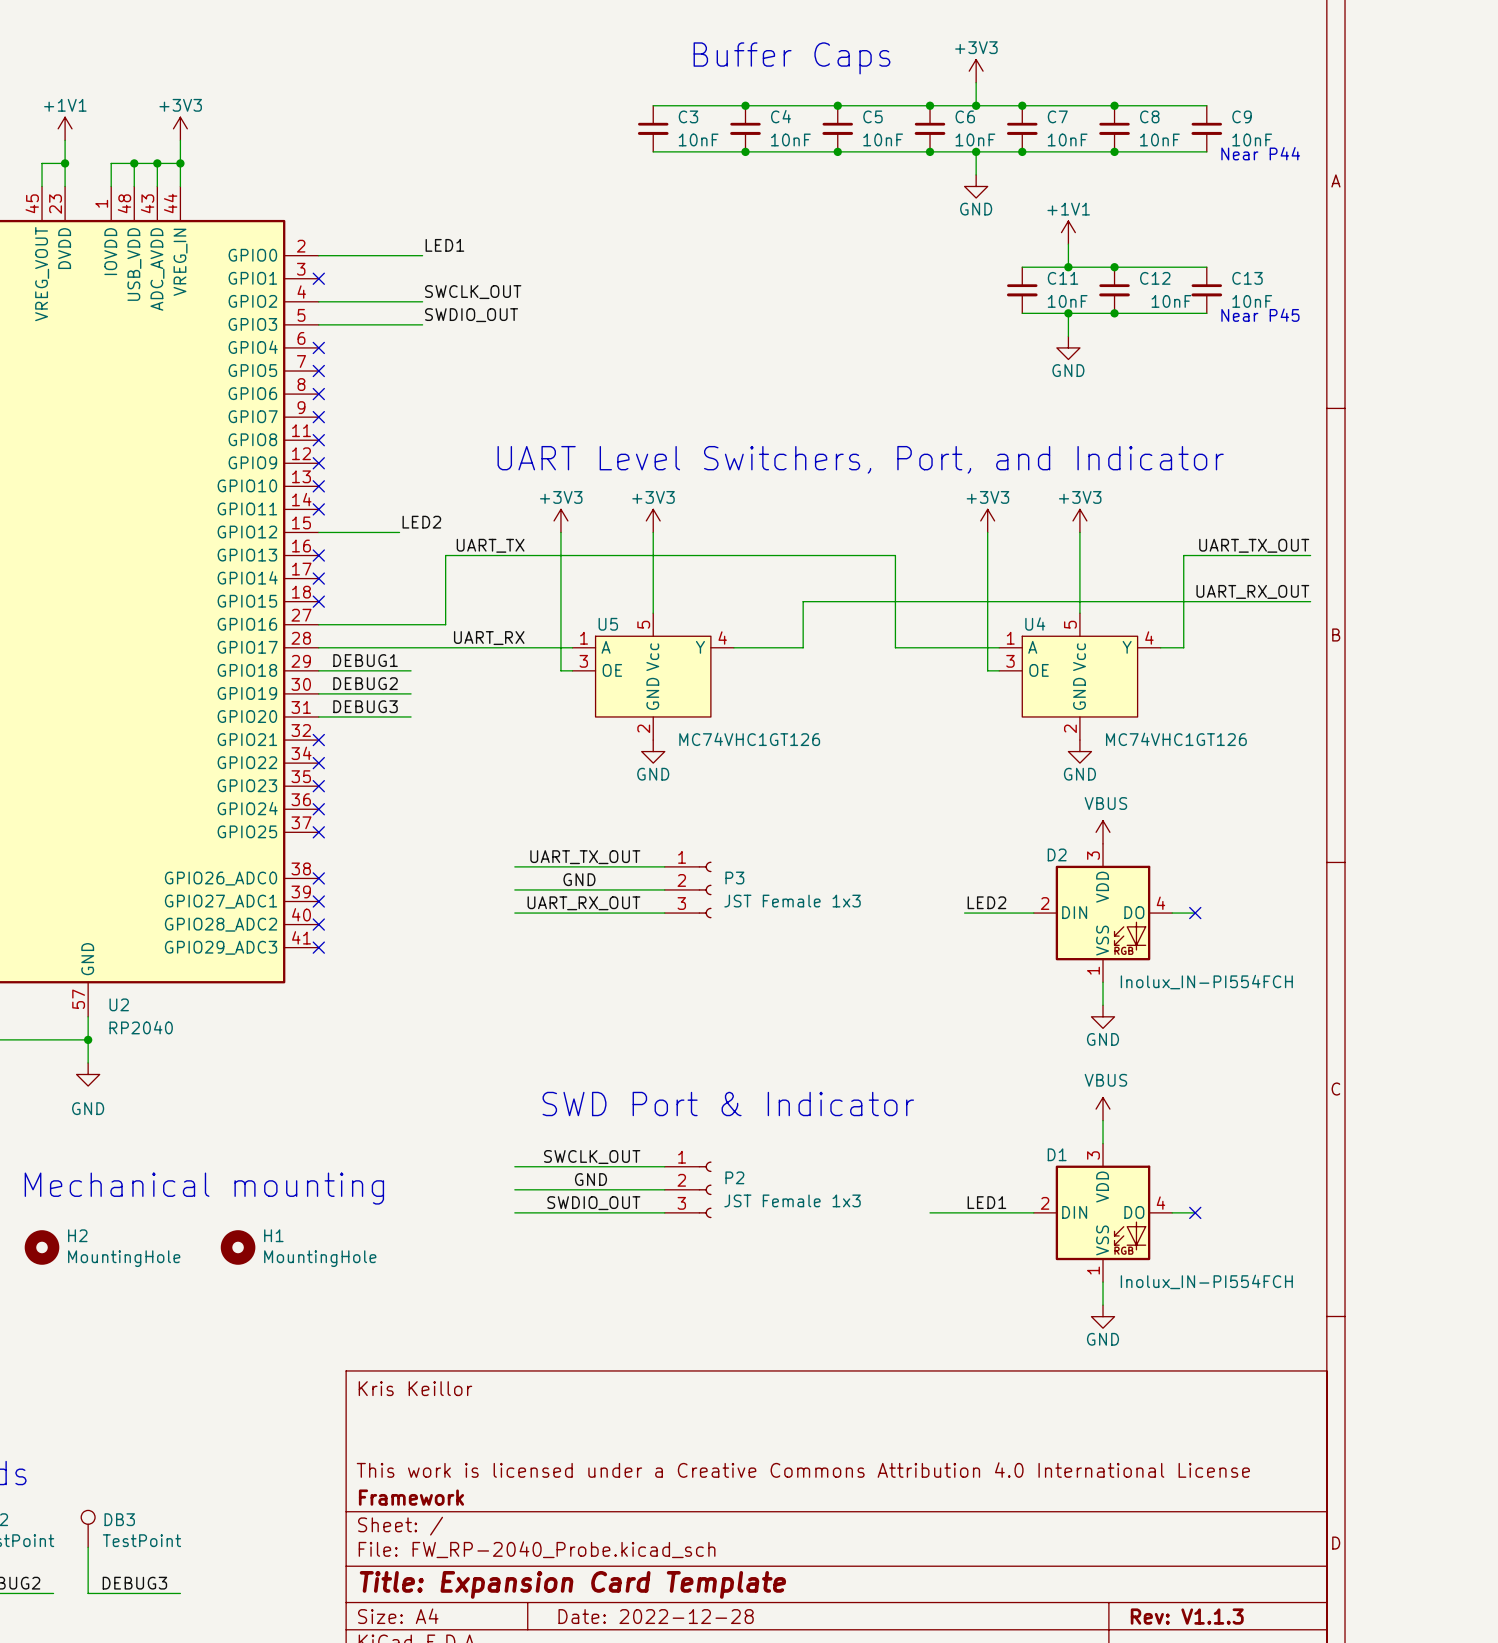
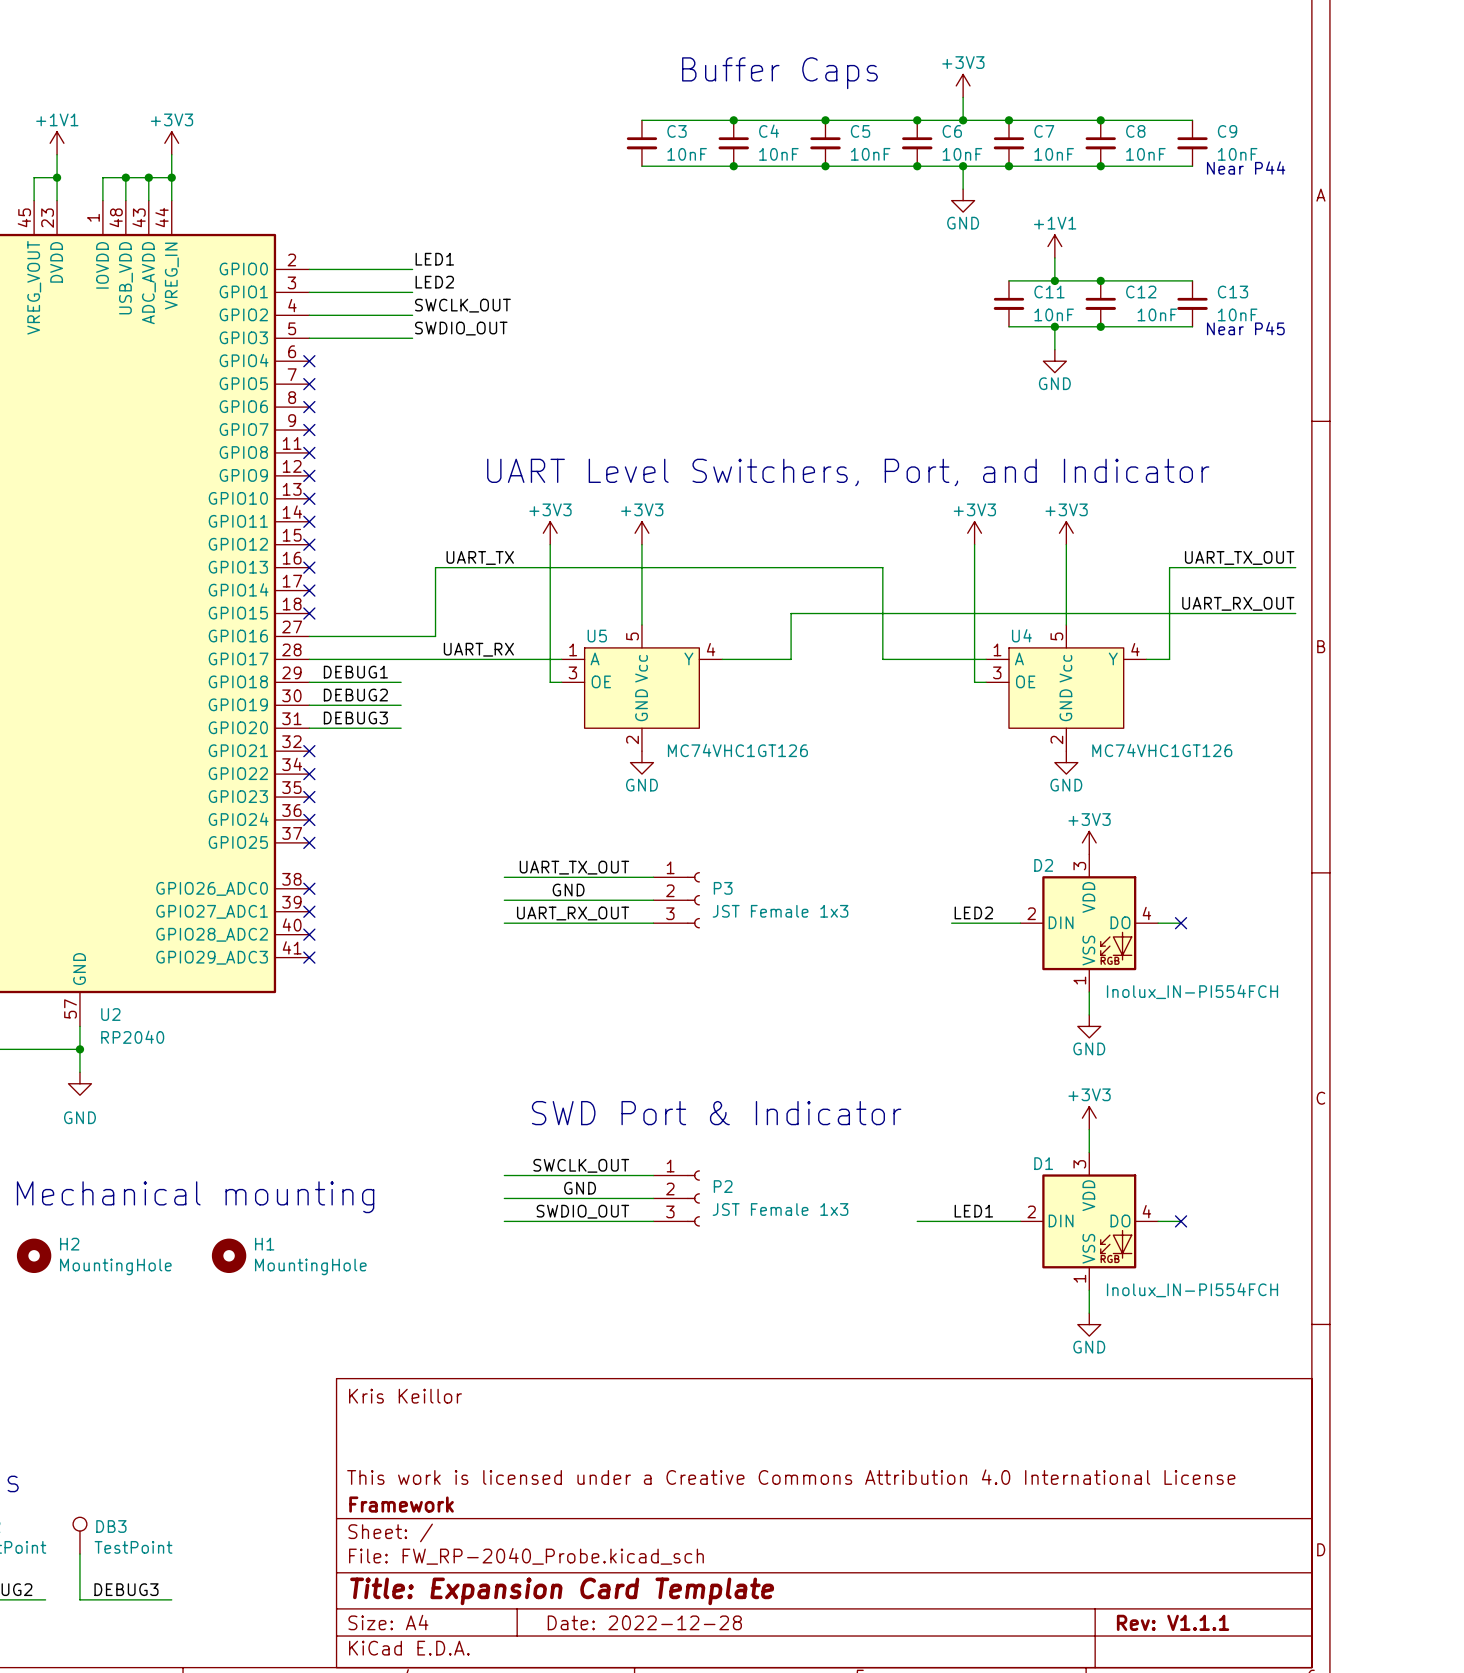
label: none -> LED2 (434, 282)
wire: none -> (309, 292) (412, 292)
no-connect mark: (318, 278) -> none
label: LED2 (421, 522) -> none
wire: (318, 532) (399, 532) -> none
no-connect mark: none -> (309, 544)
power symbol: VBUS (1103, 832) -> +3V3 (1089, 842)
power symbol: VBUS (1103, 1109) -> +3V3 (1089, 1118)
title block: Rev: V1.1.3 (1187, 1616) -> Rev: V1.1.1 (1173, 1622)

